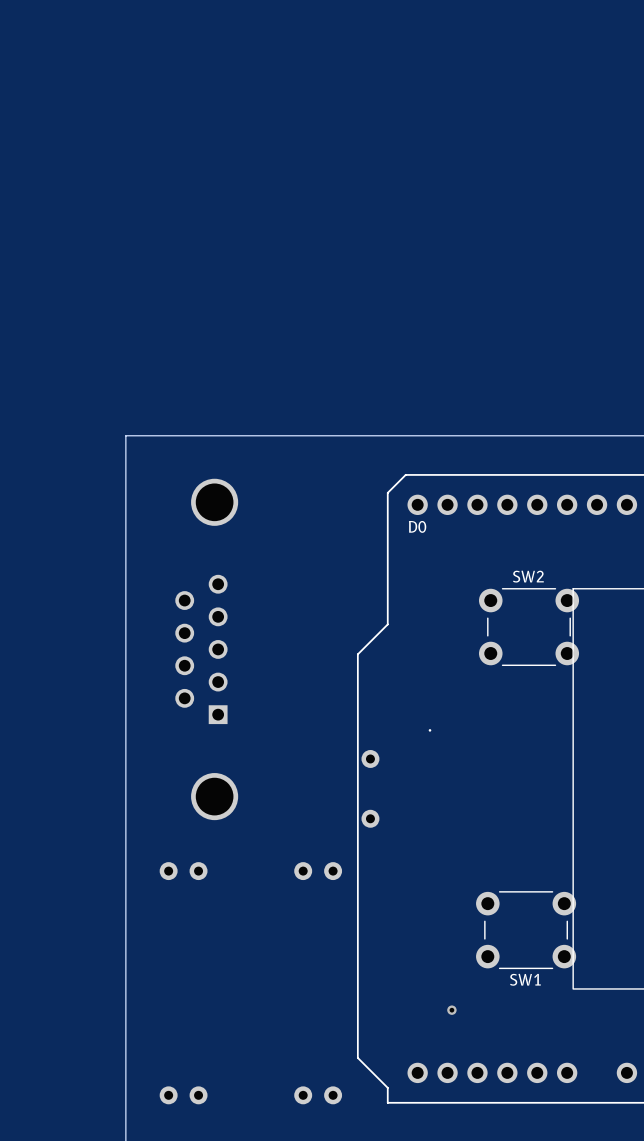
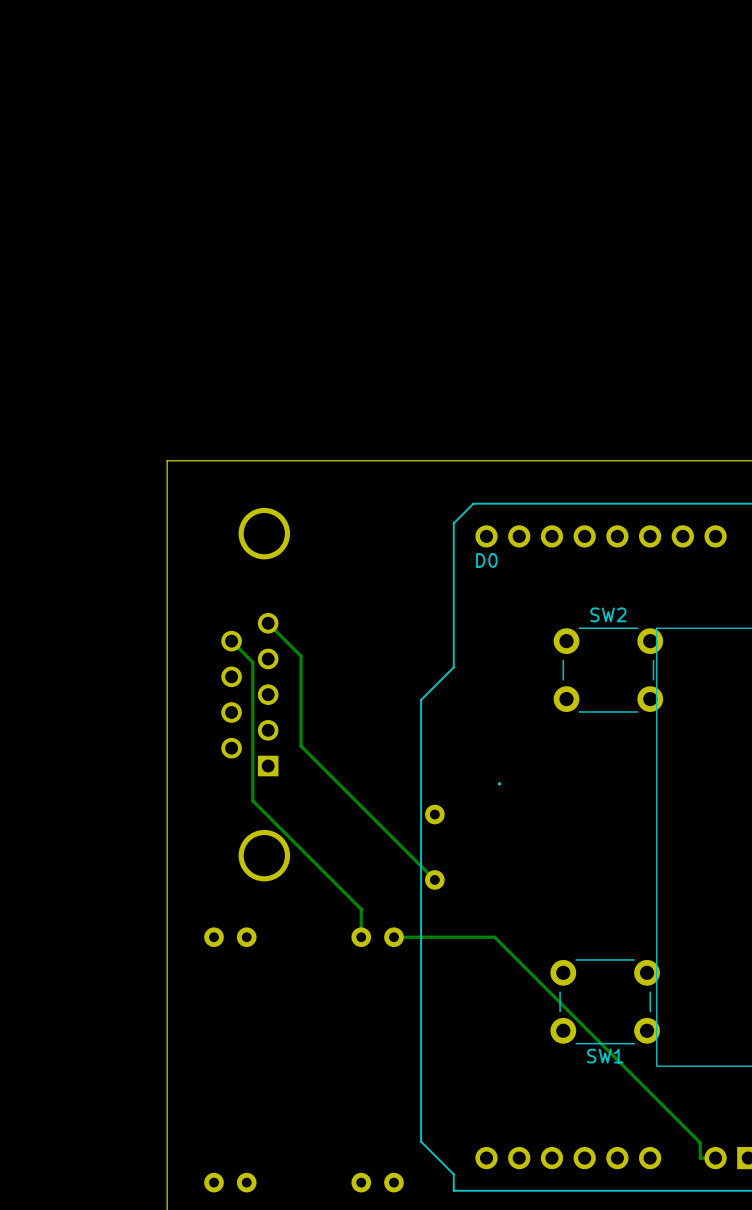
track: none -> (268, 623) (301, 656) (301, 746) (434, 879)
track: none -> (231, 641) (252, 662) (252, 800) (361, 909) (361, 937)
track: none -> (393, 937) (494, 937) (700, 1142) (700, 1158) (715, 1158)
via: (451, 1010) -> none

